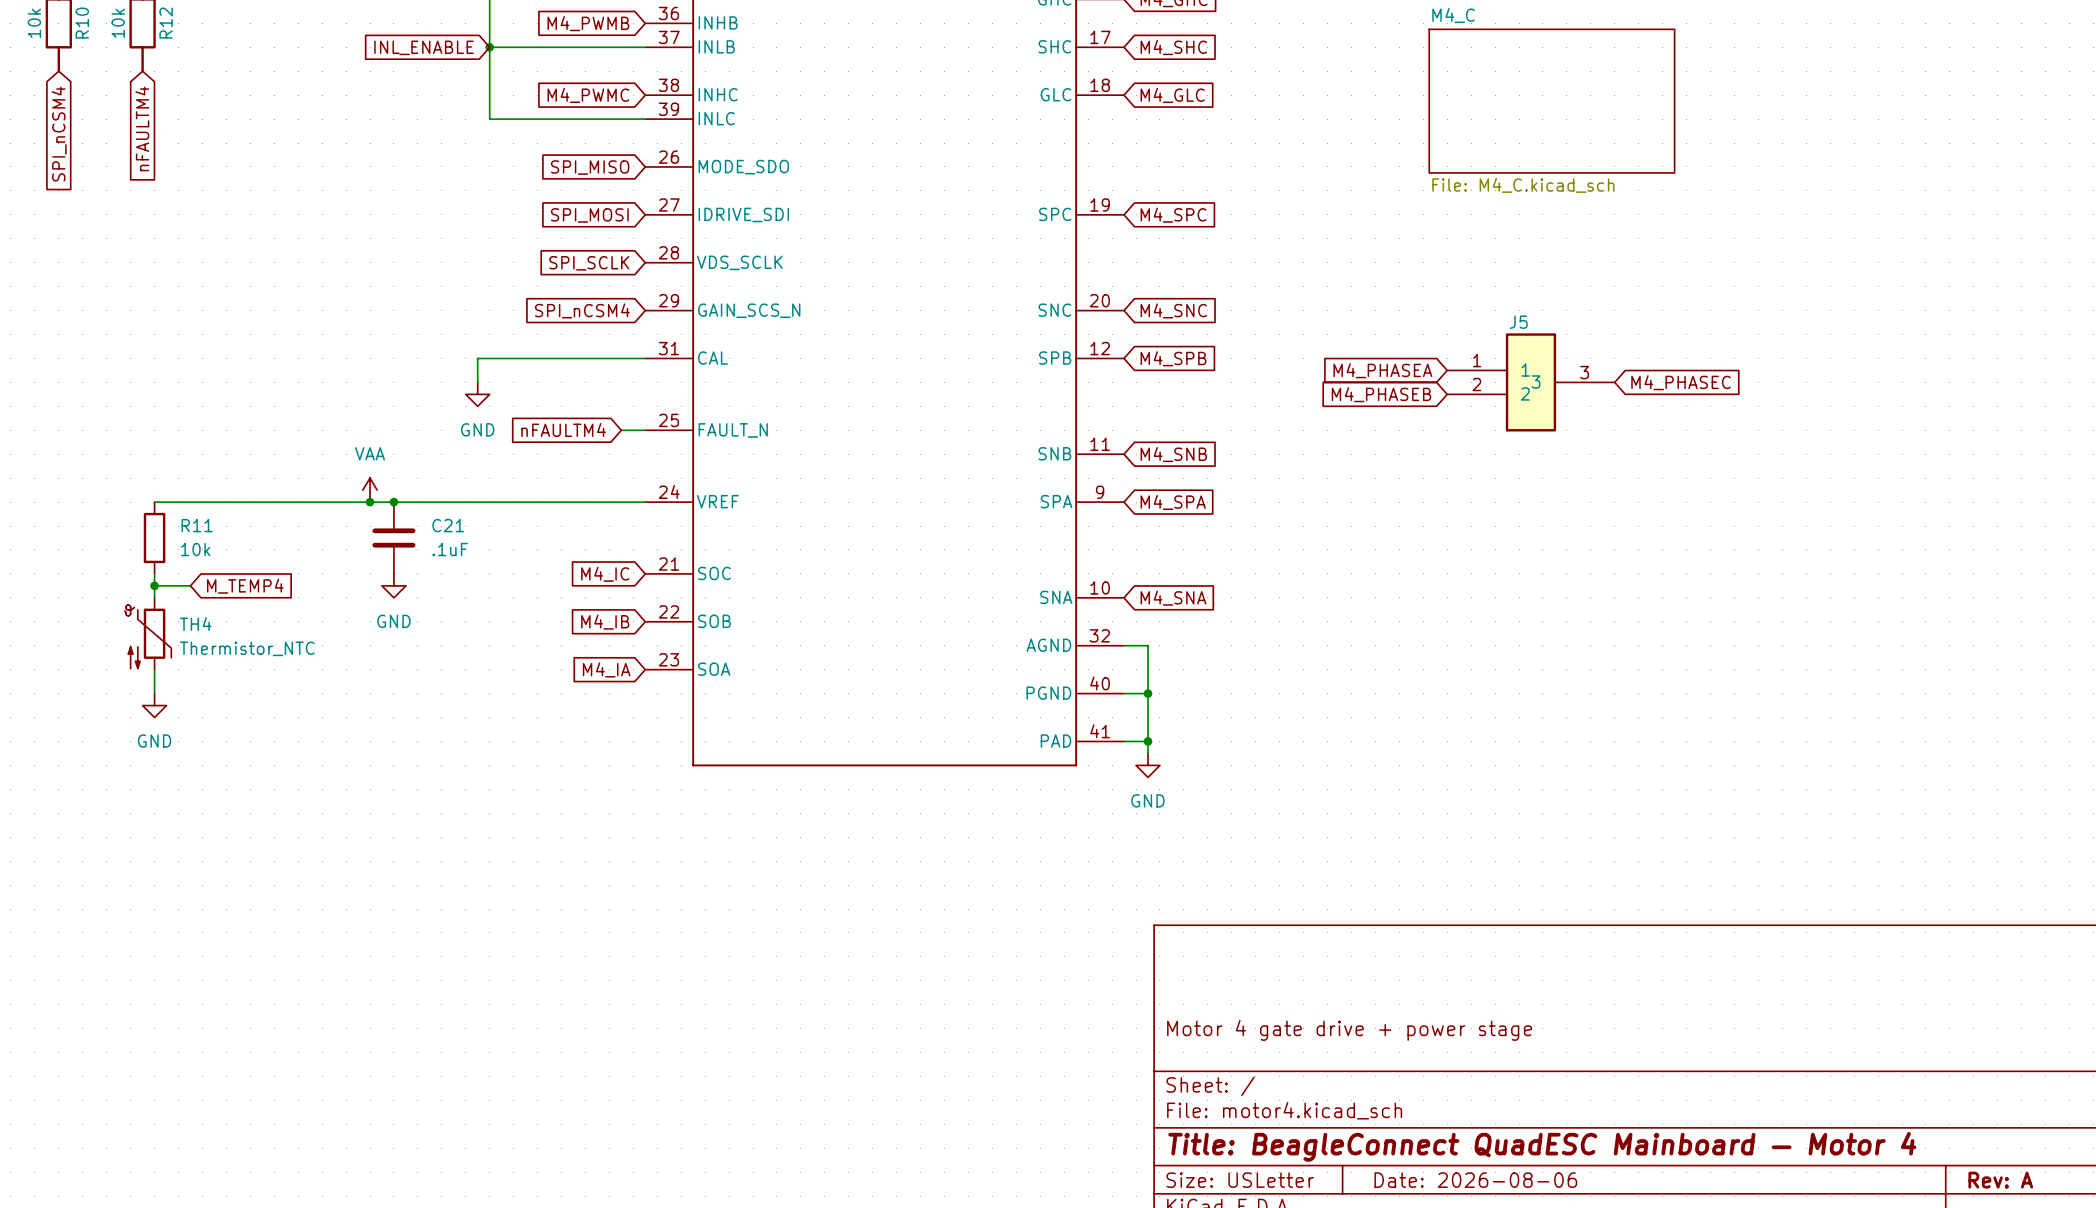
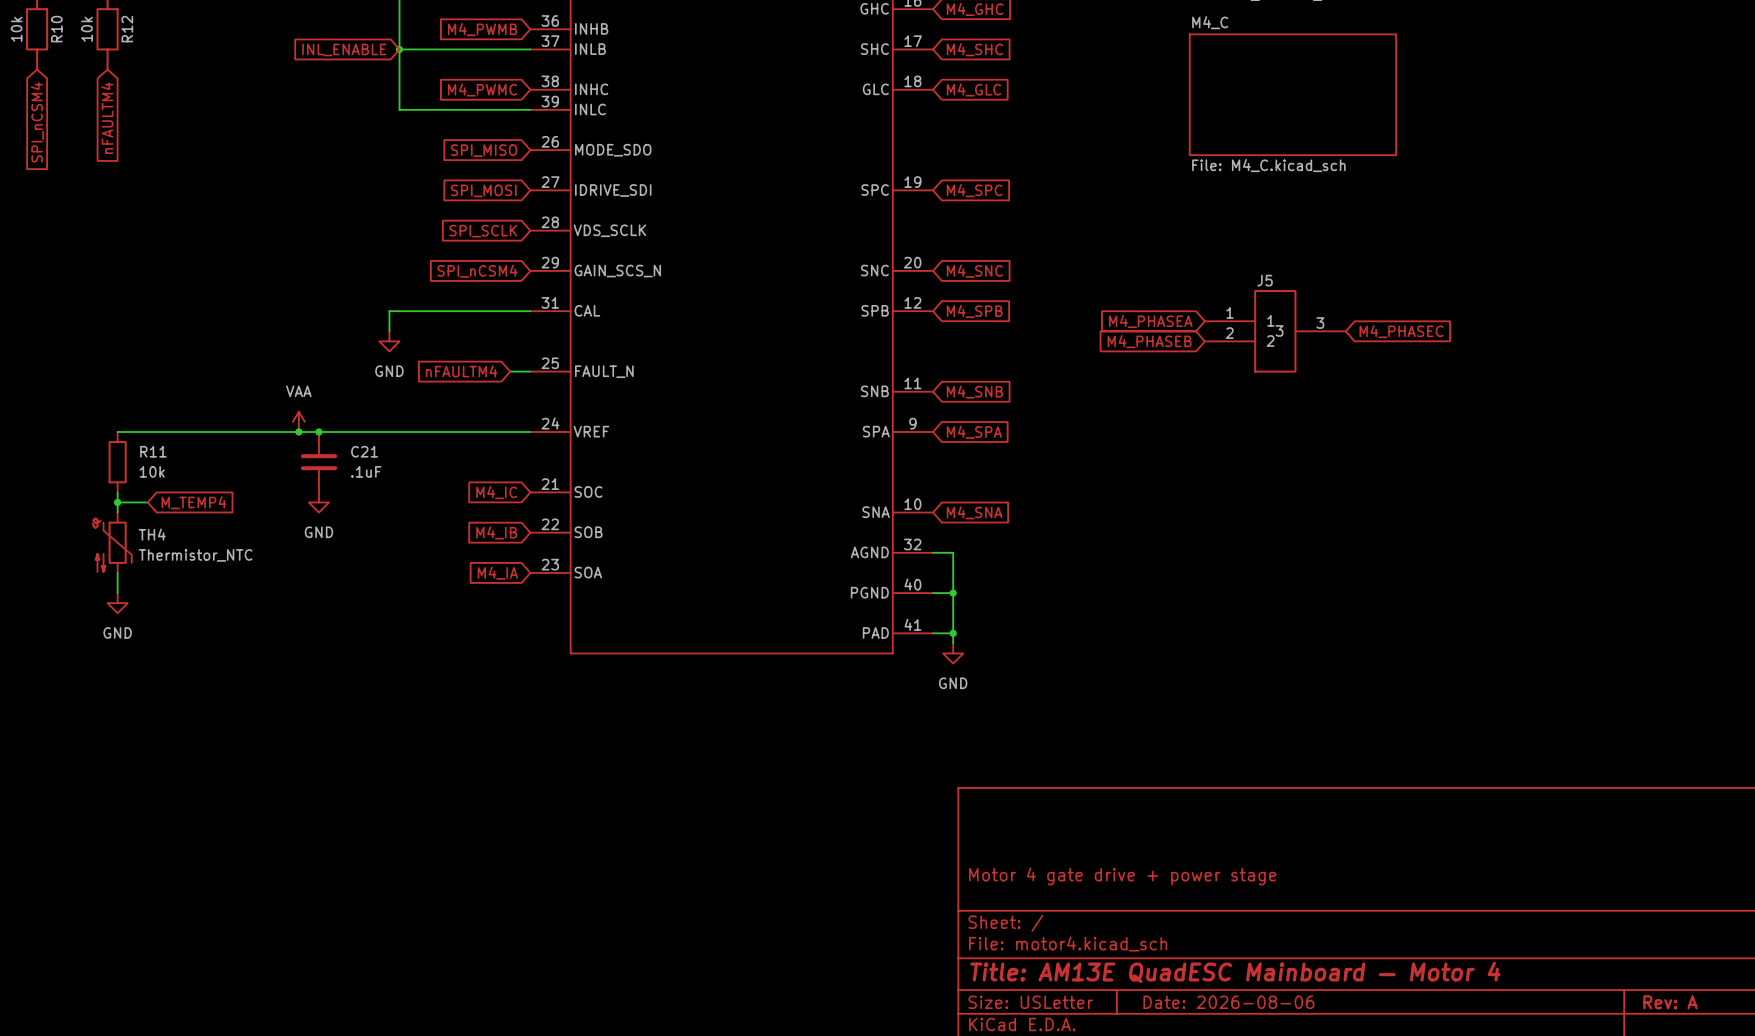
title block: Title: BeagleConnect QuadESC Mainboard — Motor 4 (1542, 1146) -> Title: AM13E QuadESC Mainboard — Motor 4 (1235, 972)

